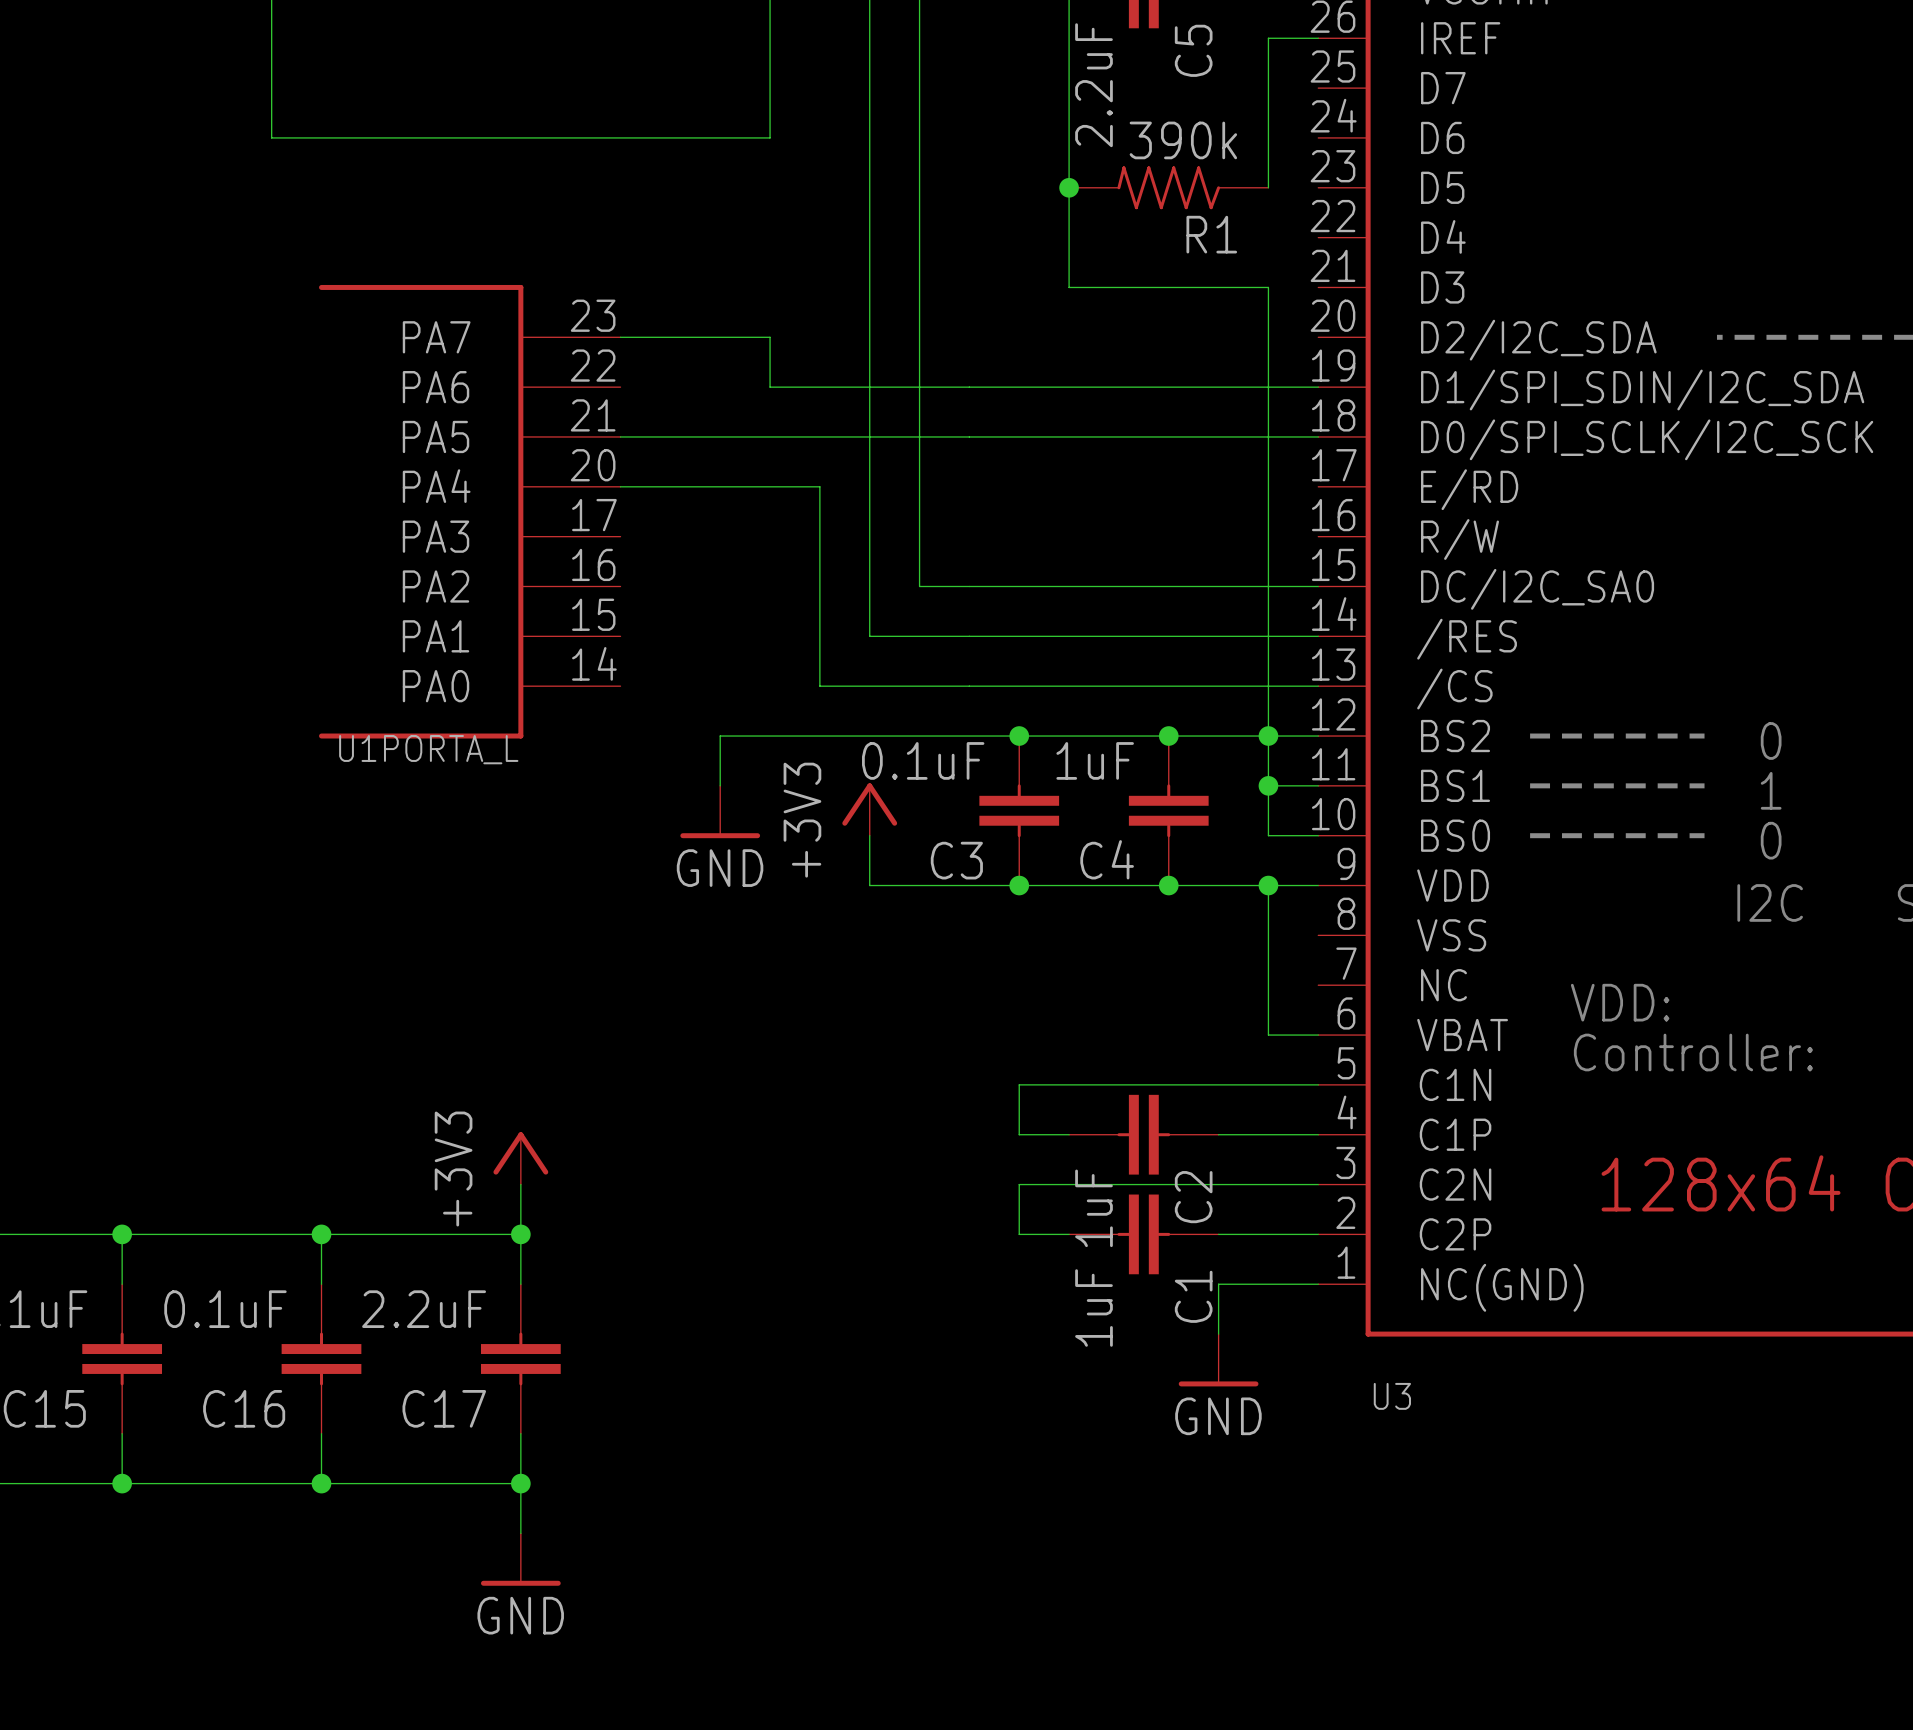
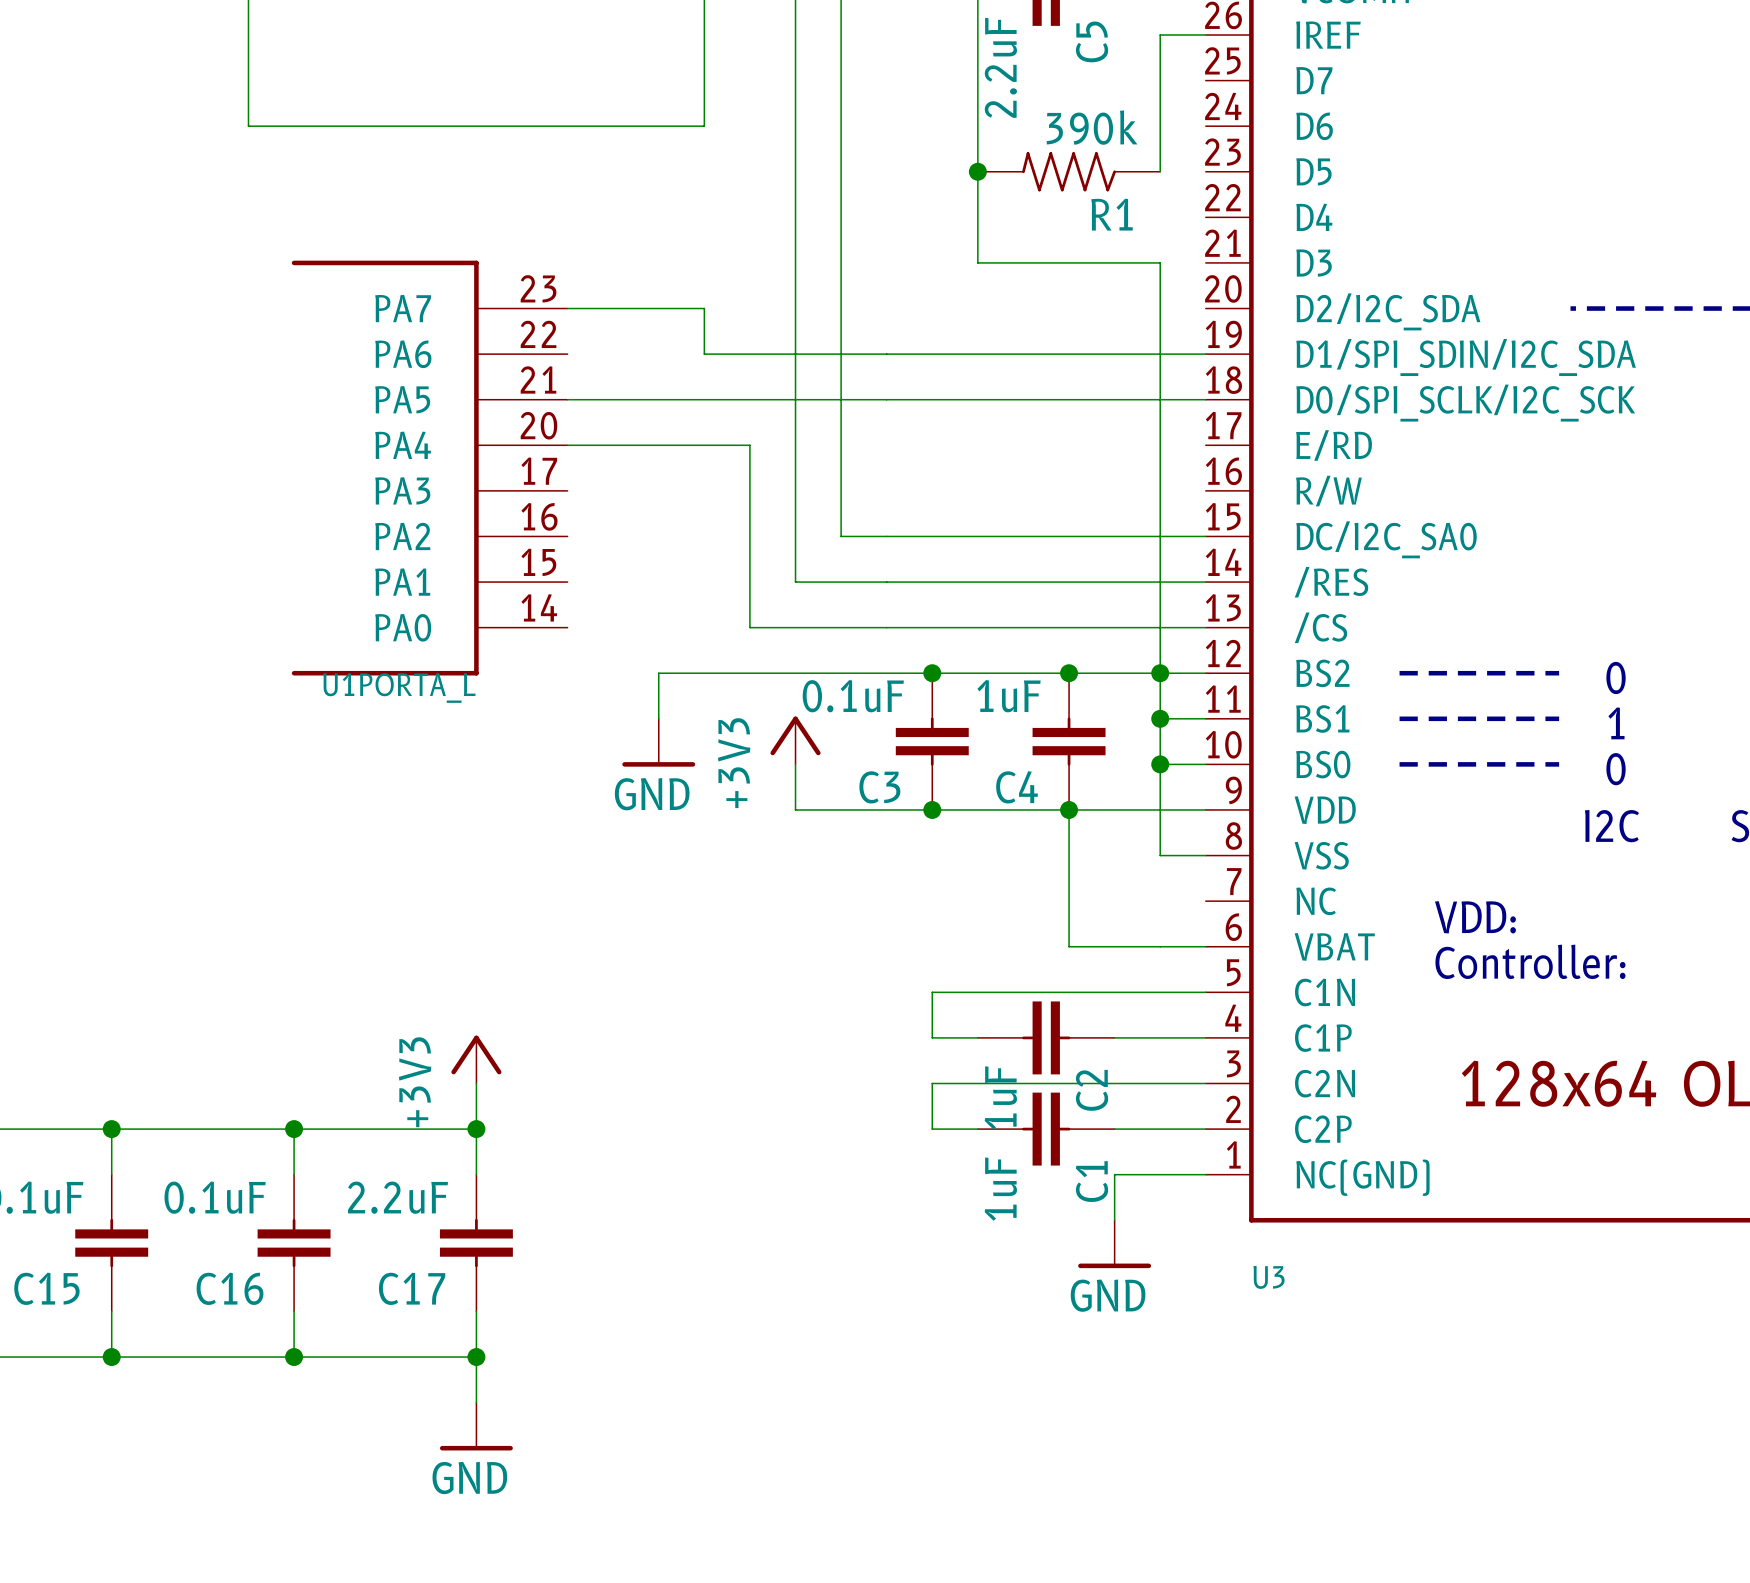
wire: none -> (1160, 764) (1160, 809)
junction position: (1268, 885) -> (1160, 764)
wire: (1268, 935) (1268, 1035) -> (1069, 809) (1069, 946) (1160, 946)
wire: none -> (1160, 855) (1205, 855)

